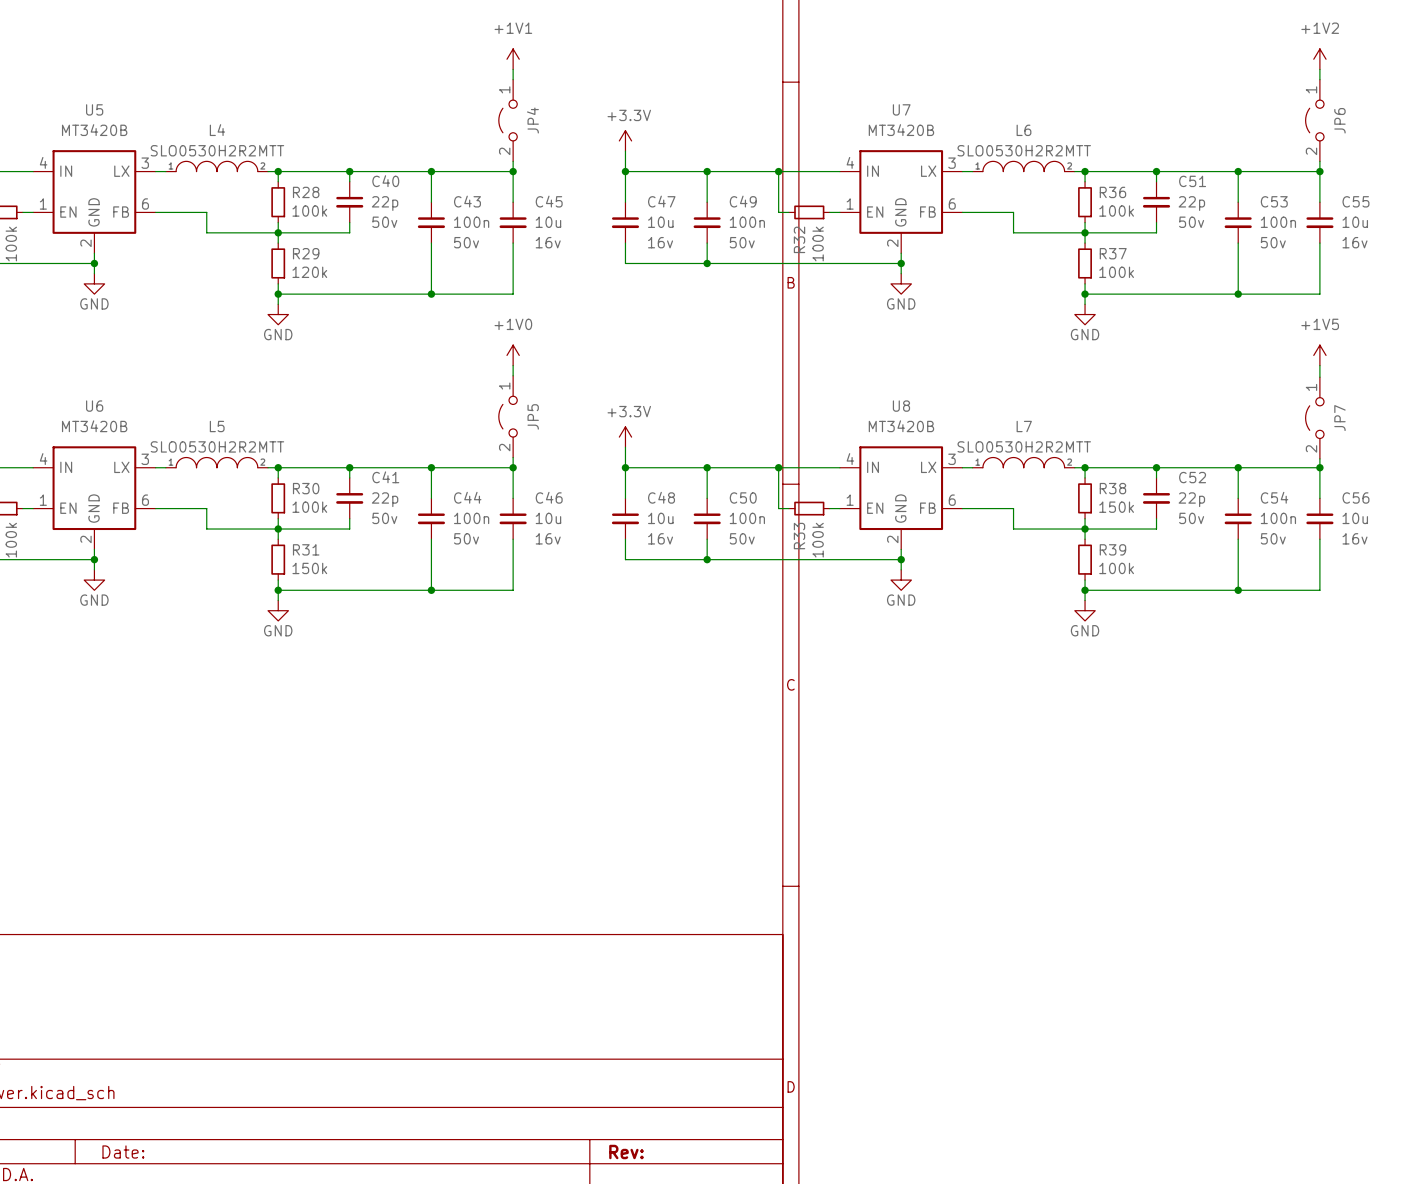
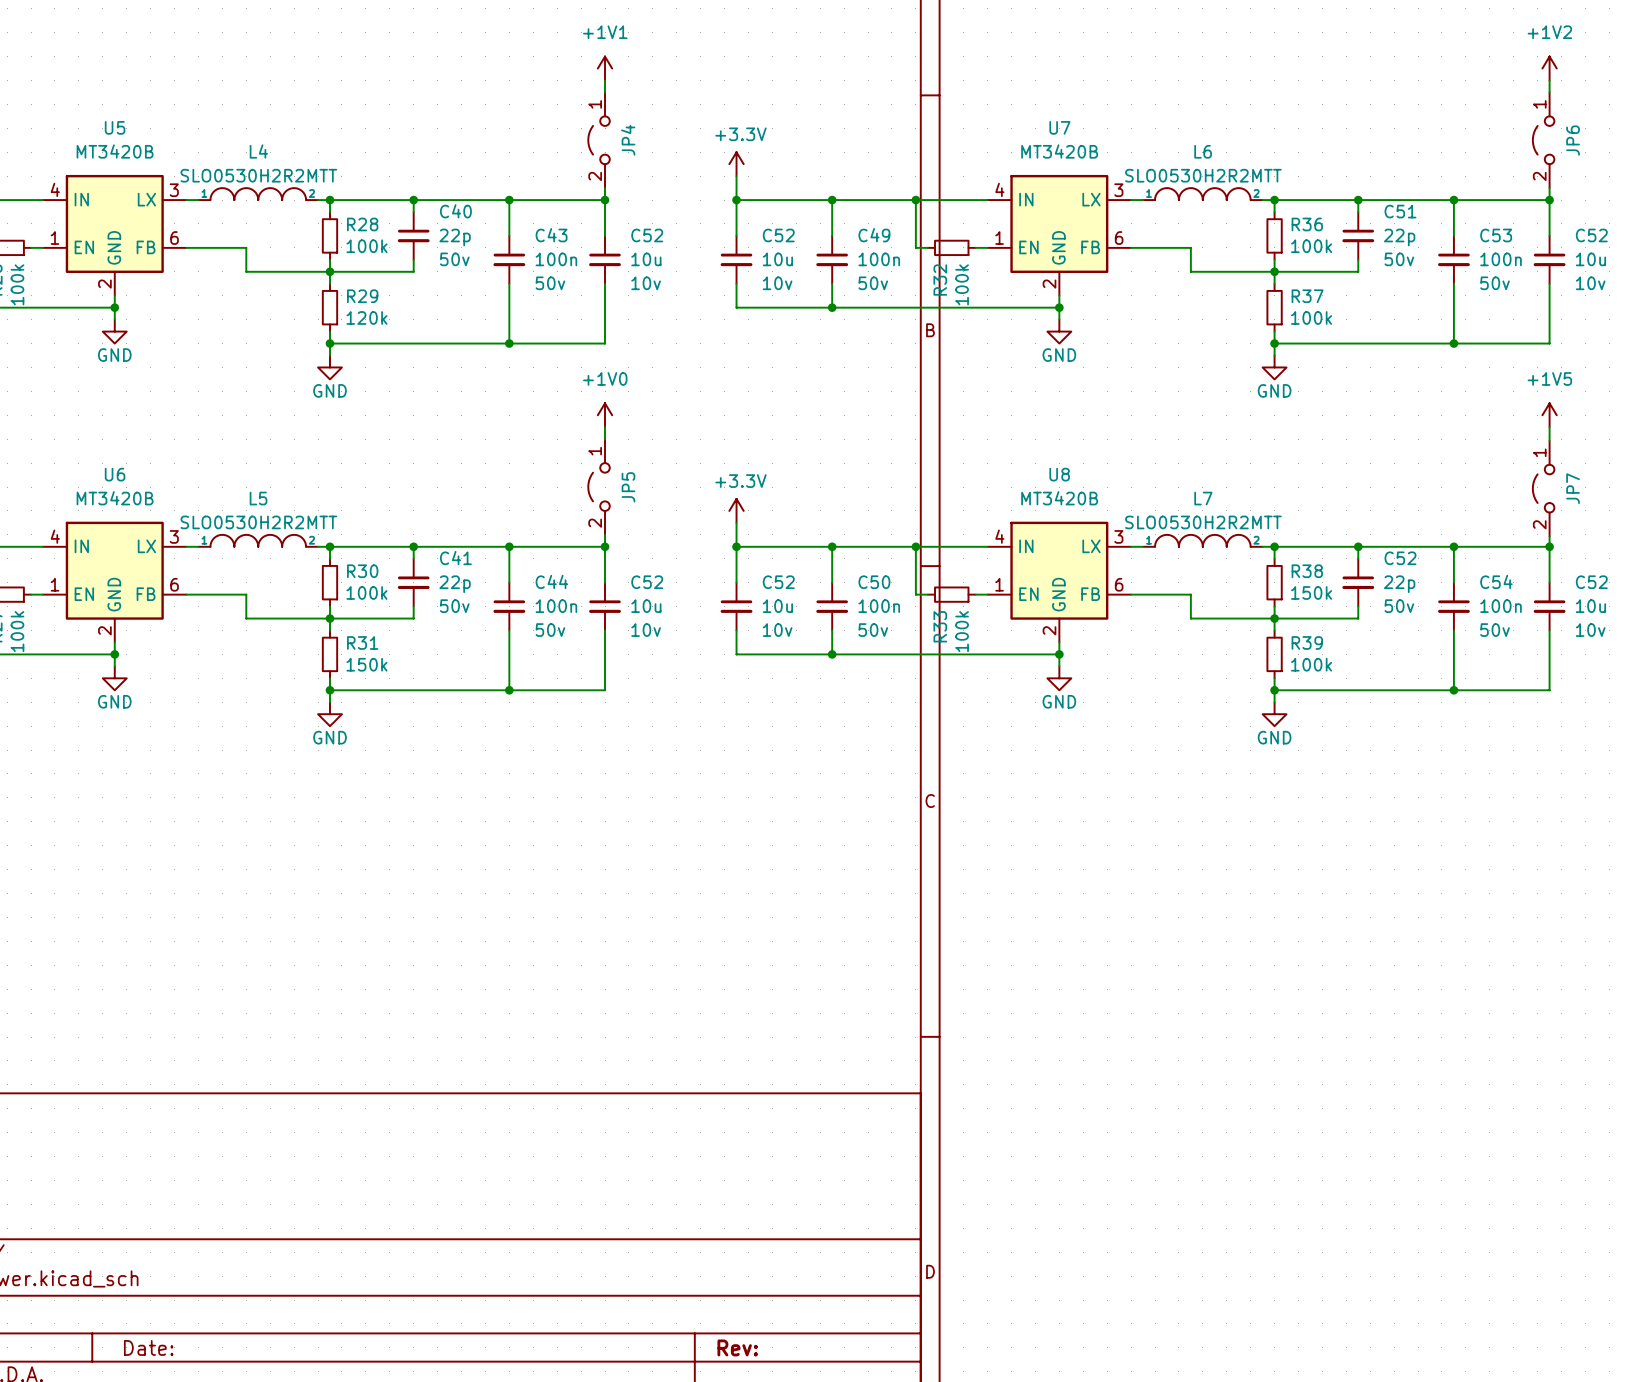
C45 name: C45 (549, 201) -> C52 (647, 235)
C47 name: C47 (661, 201) -> C52 (778, 235)
C55 name: C55 (1355, 201) -> C52 (1591, 235)
C45 text: 16v (548, 242) -> 10v (646, 283)
C47 text: 16v (660, 242) -> 10v (777, 283)
C55 text: 16v (1355, 242) -> 10v (1590, 283)
C46 name: C46 (549, 497) -> C52 (647, 582)
C48 name: C48 (661, 497) -> C52 (778, 582)
C56 name: C56 (1355, 497) -> C52 (1591, 582)
C46 text: 16v (548, 538) -> 10v (646, 630)
C48 text: 16v (660, 538) -> 10v (777, 630)
C56 text: 16v (1355, 538) -> 10v (1590, 630)

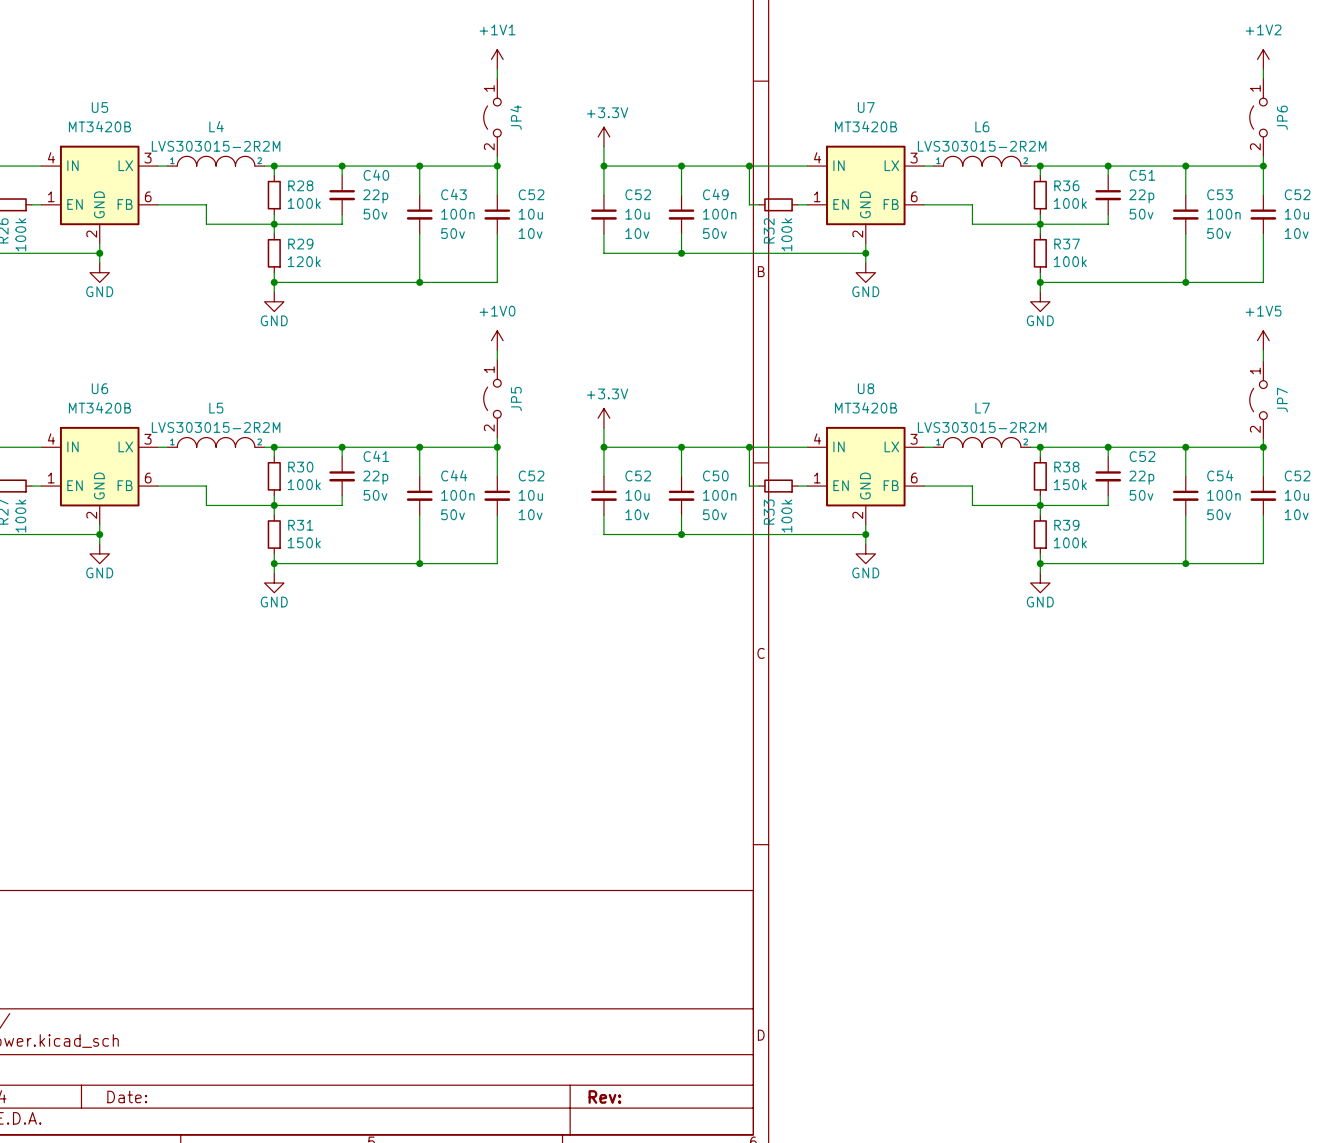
L4 value: SLO0530H2R2MTT (258, 175) -> LVS303015-2R2M (216, 146)
L6 value: SLO0530H2R2MTT (1203, 175) -> LVS303015-2R2M (982, 146)
L5 value: SLO0530H2R2MTT (258, 522) -> LVS303015-2R2M (216, 427)
L7 value: SLO0530H2R2MTT (1203, 522) -> LVS303015-2R2M (982, 427)

